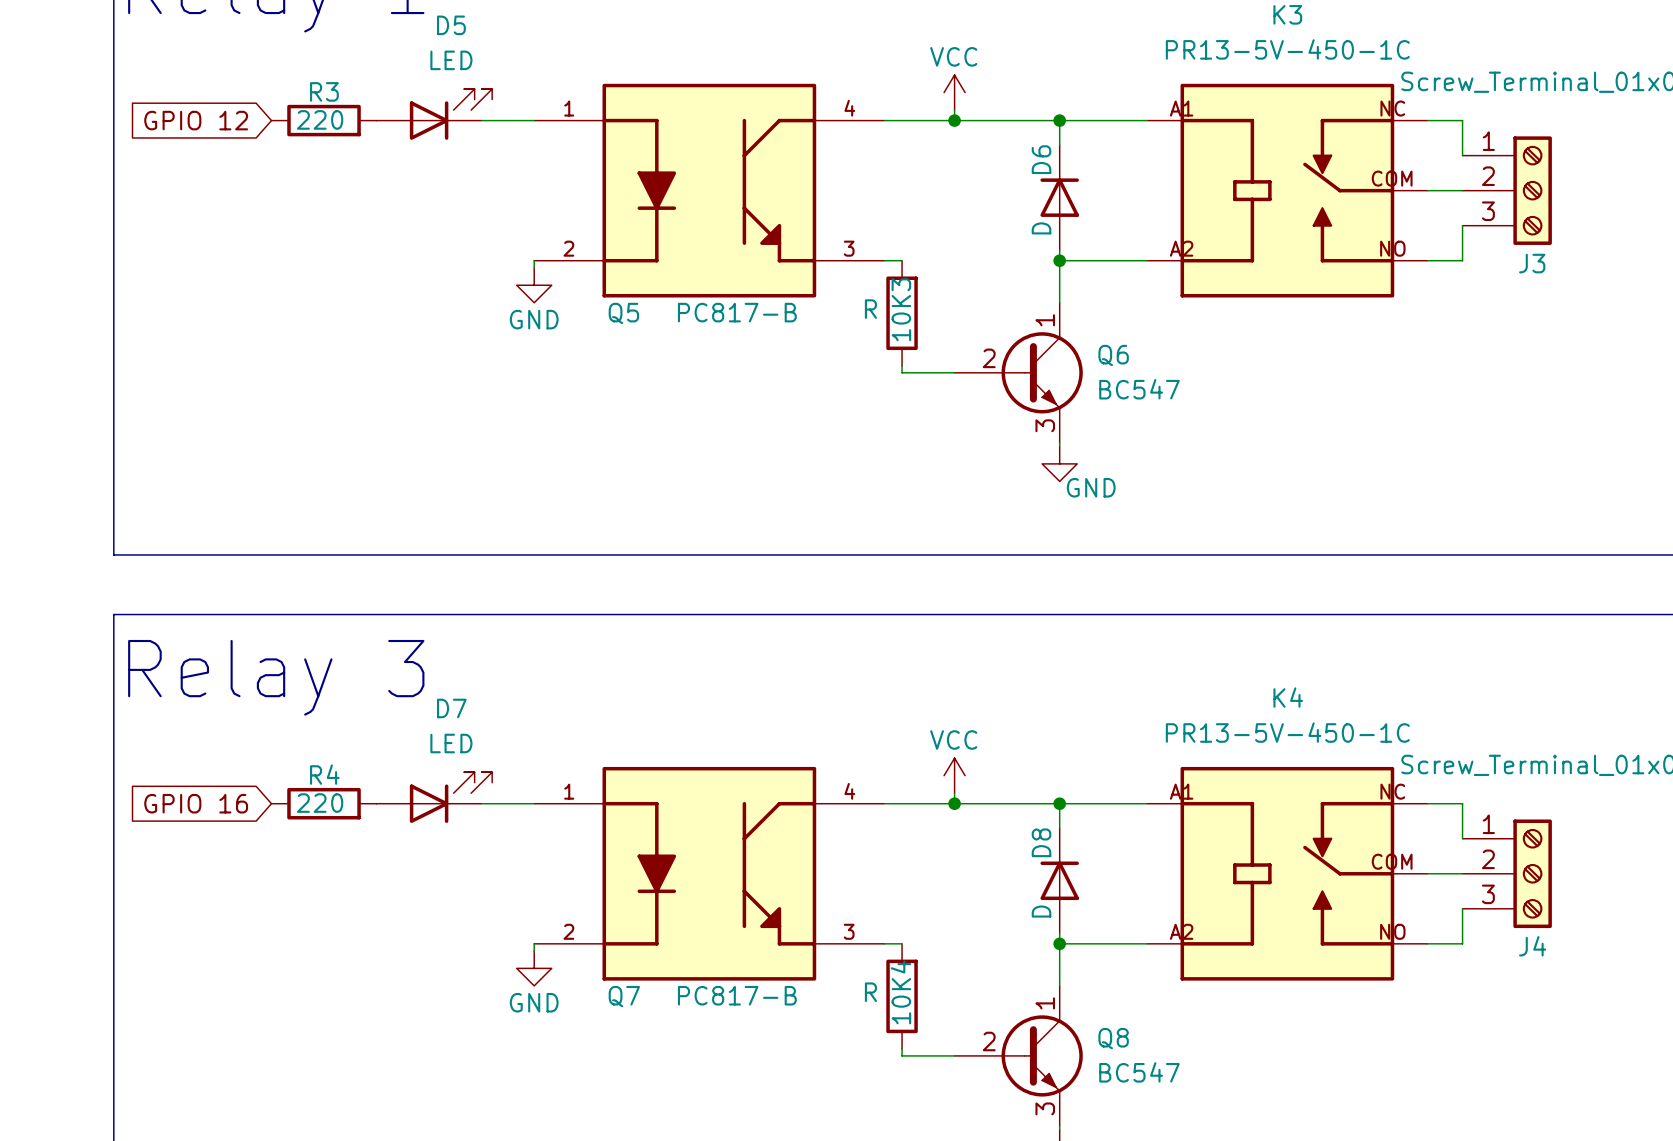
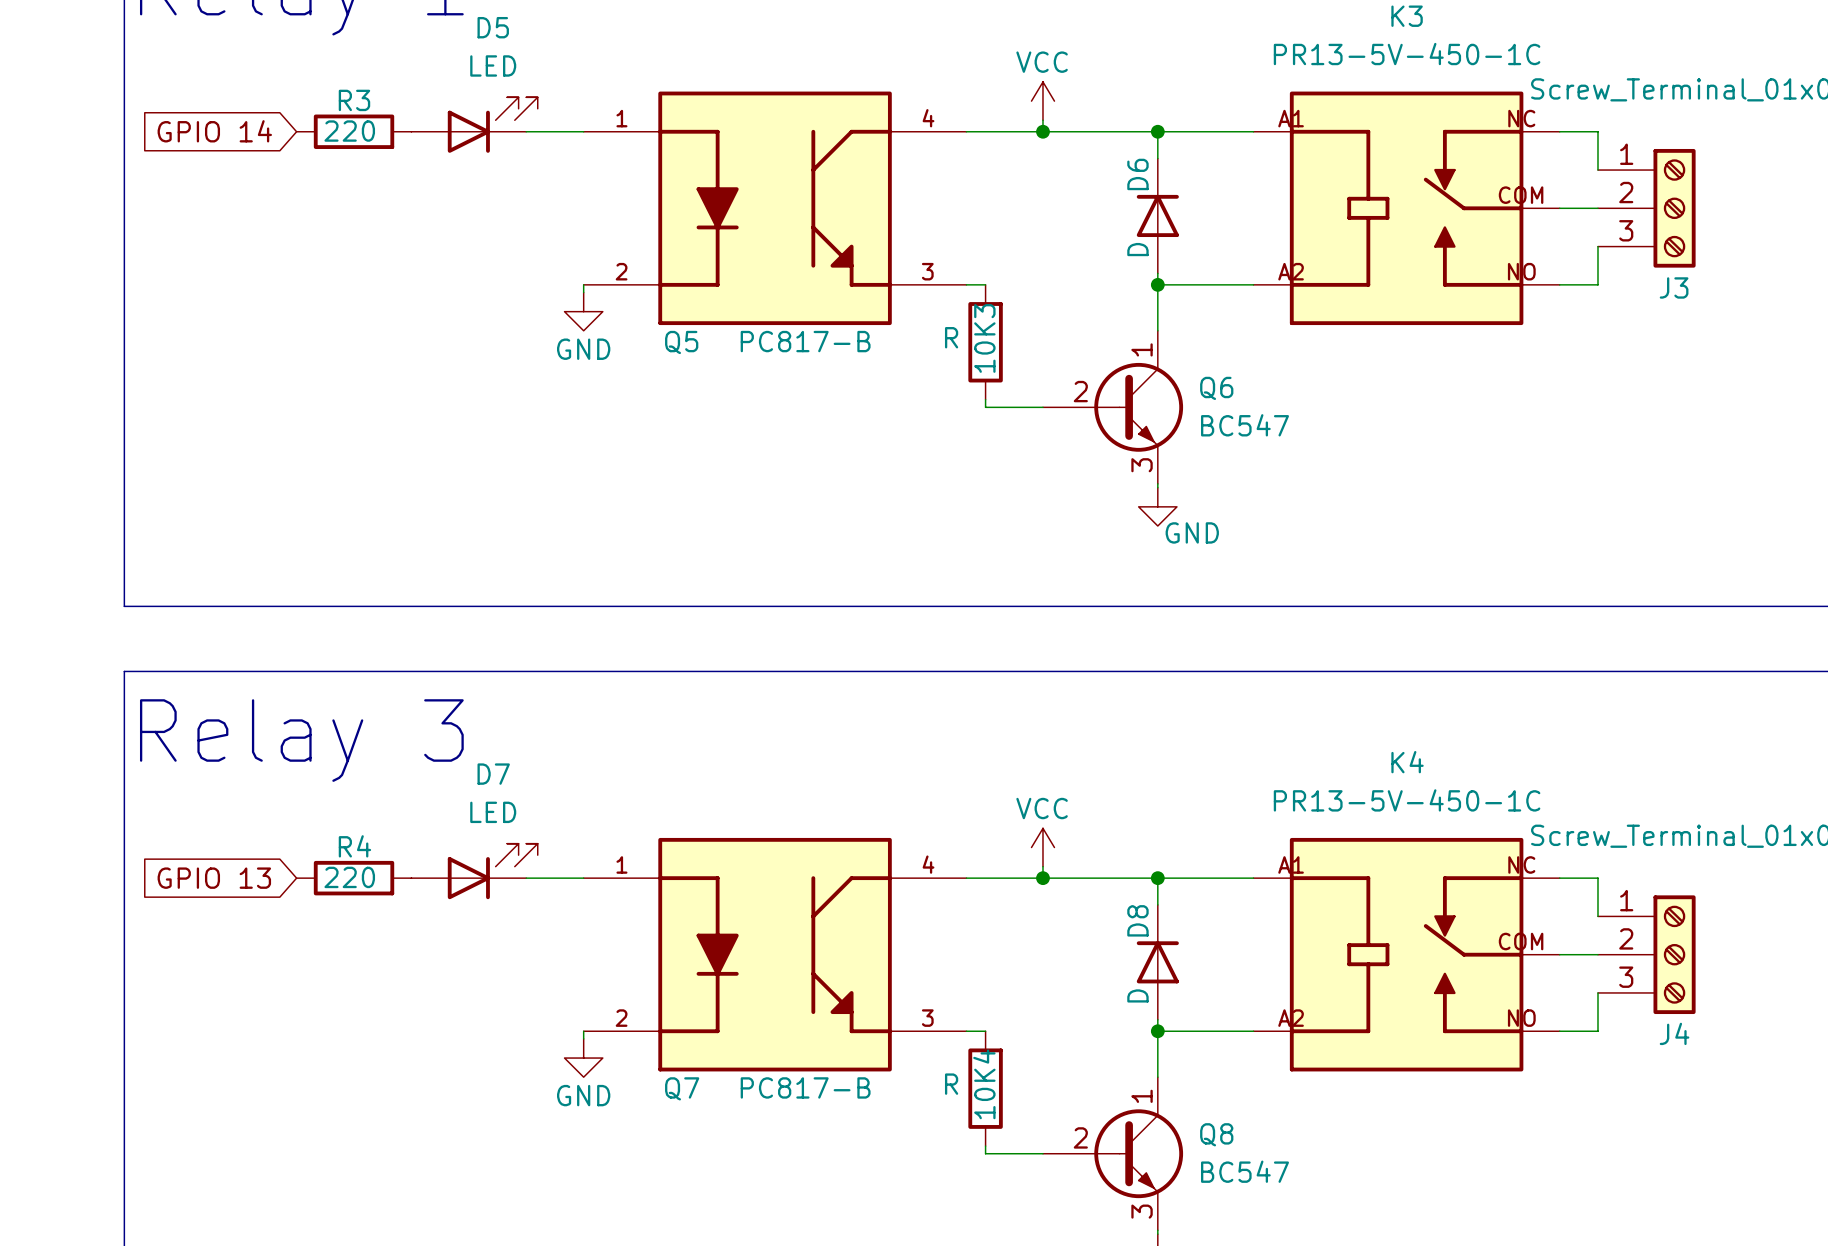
global label: GPIO 12 (196, 120) -> GPIO 14 (214, 131)
global label: GPIO 16 (196, 803) -> GPIO 13 (214, 878)

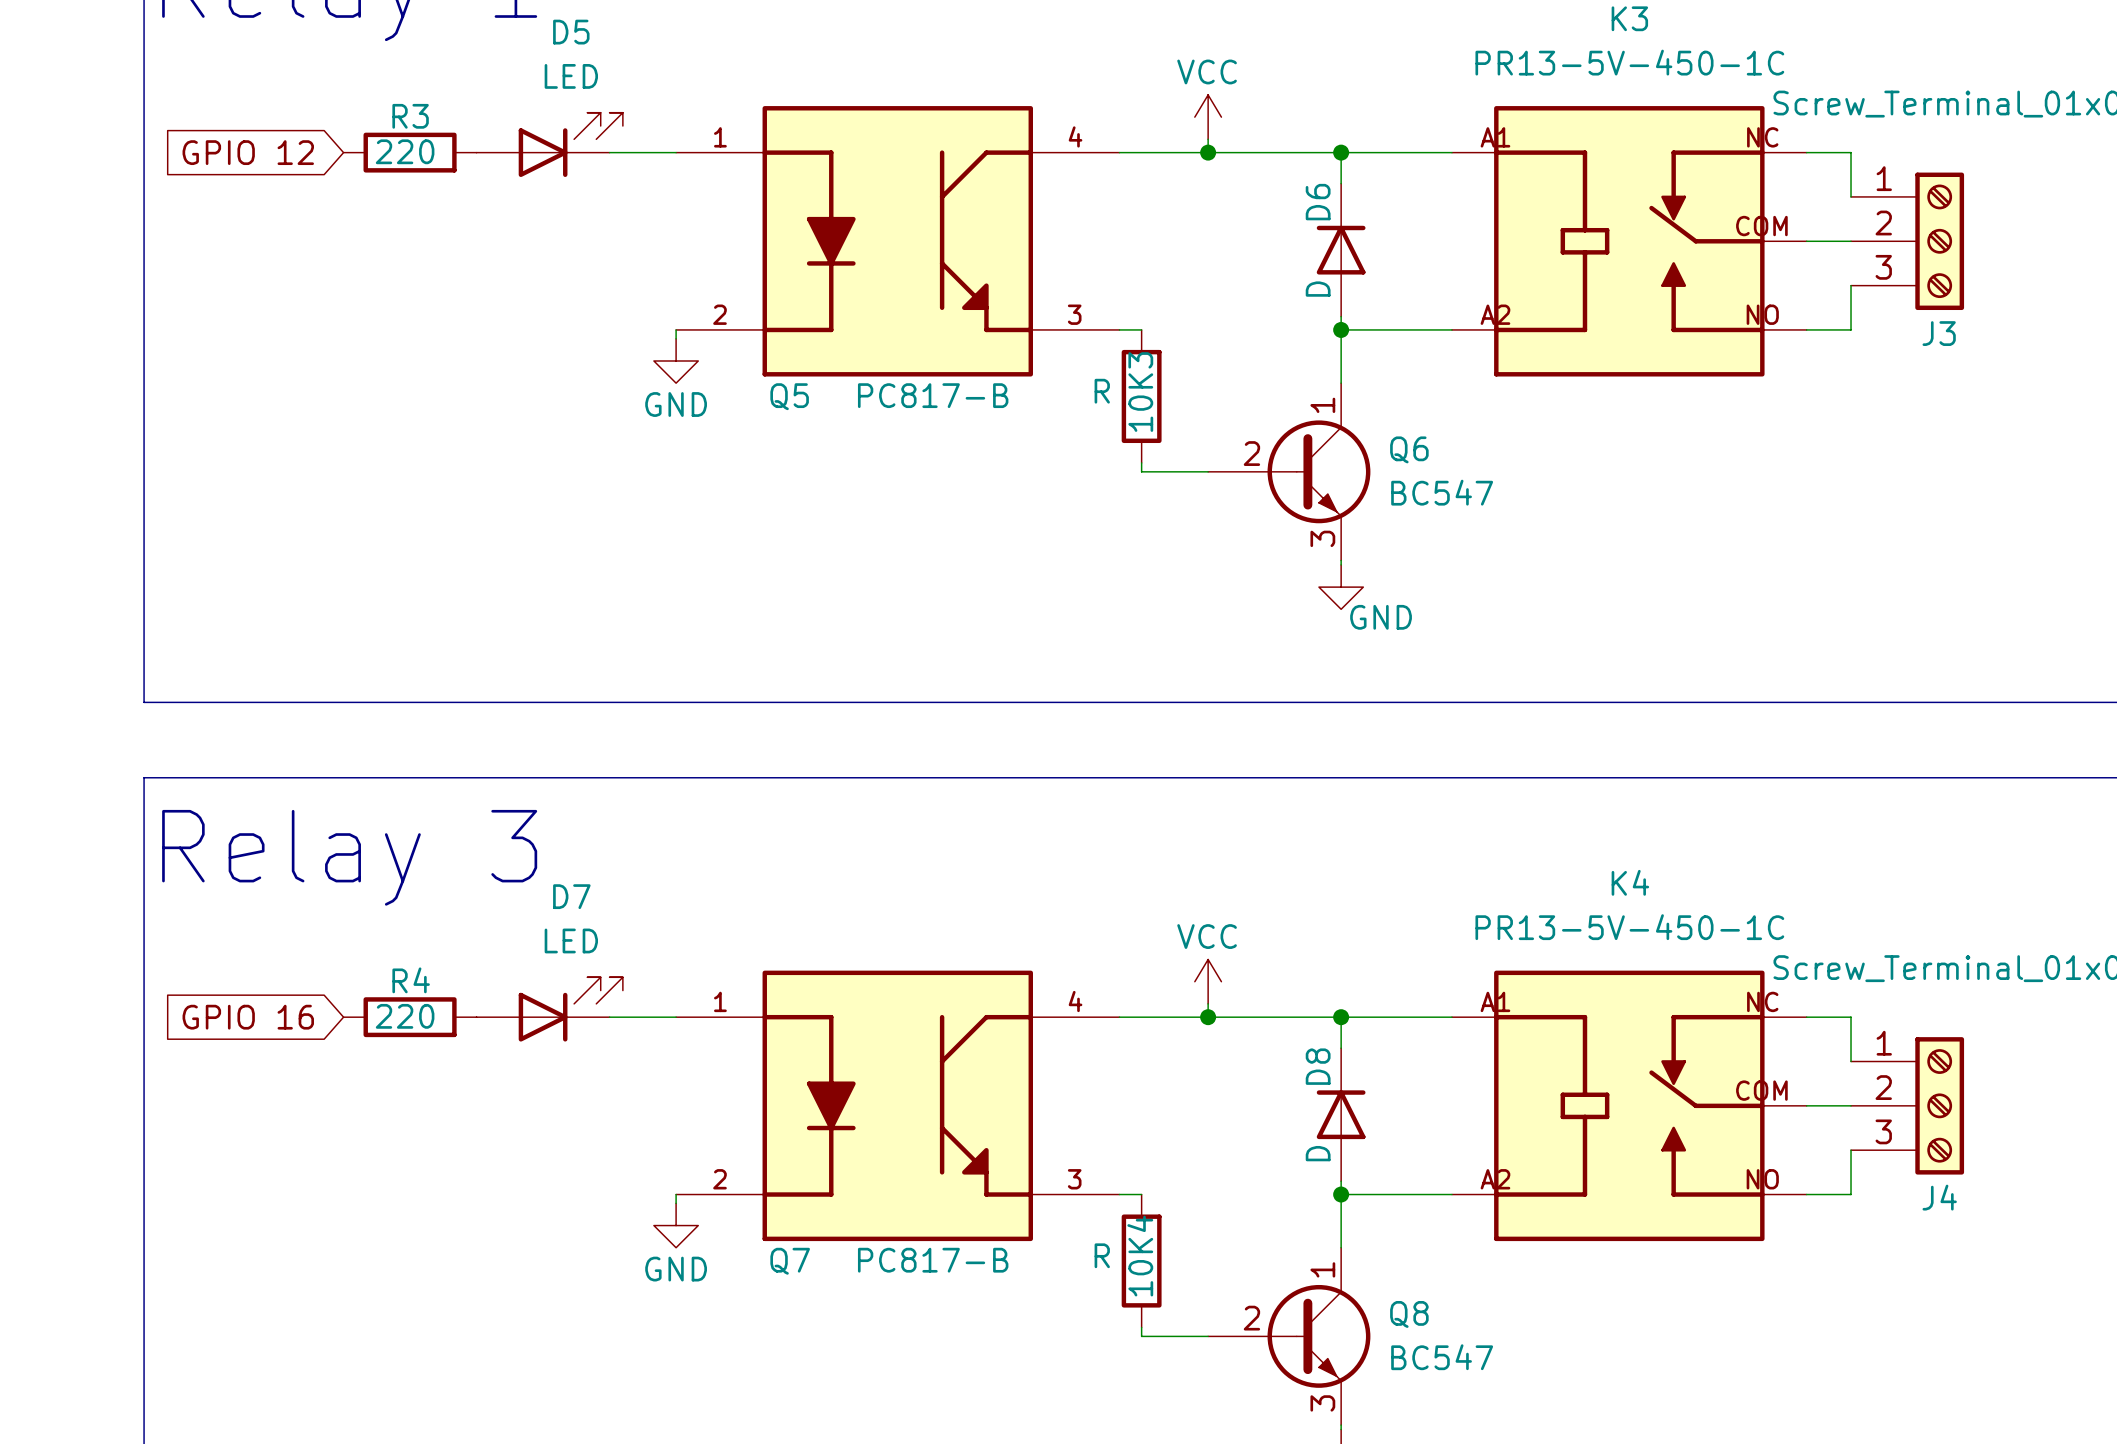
global label: GPIO 14 (214, 131) -> GPIO 12 (248, 152)
global label: GPIO 13 (214, 878) -> GPIO 16 (248, 1017)

